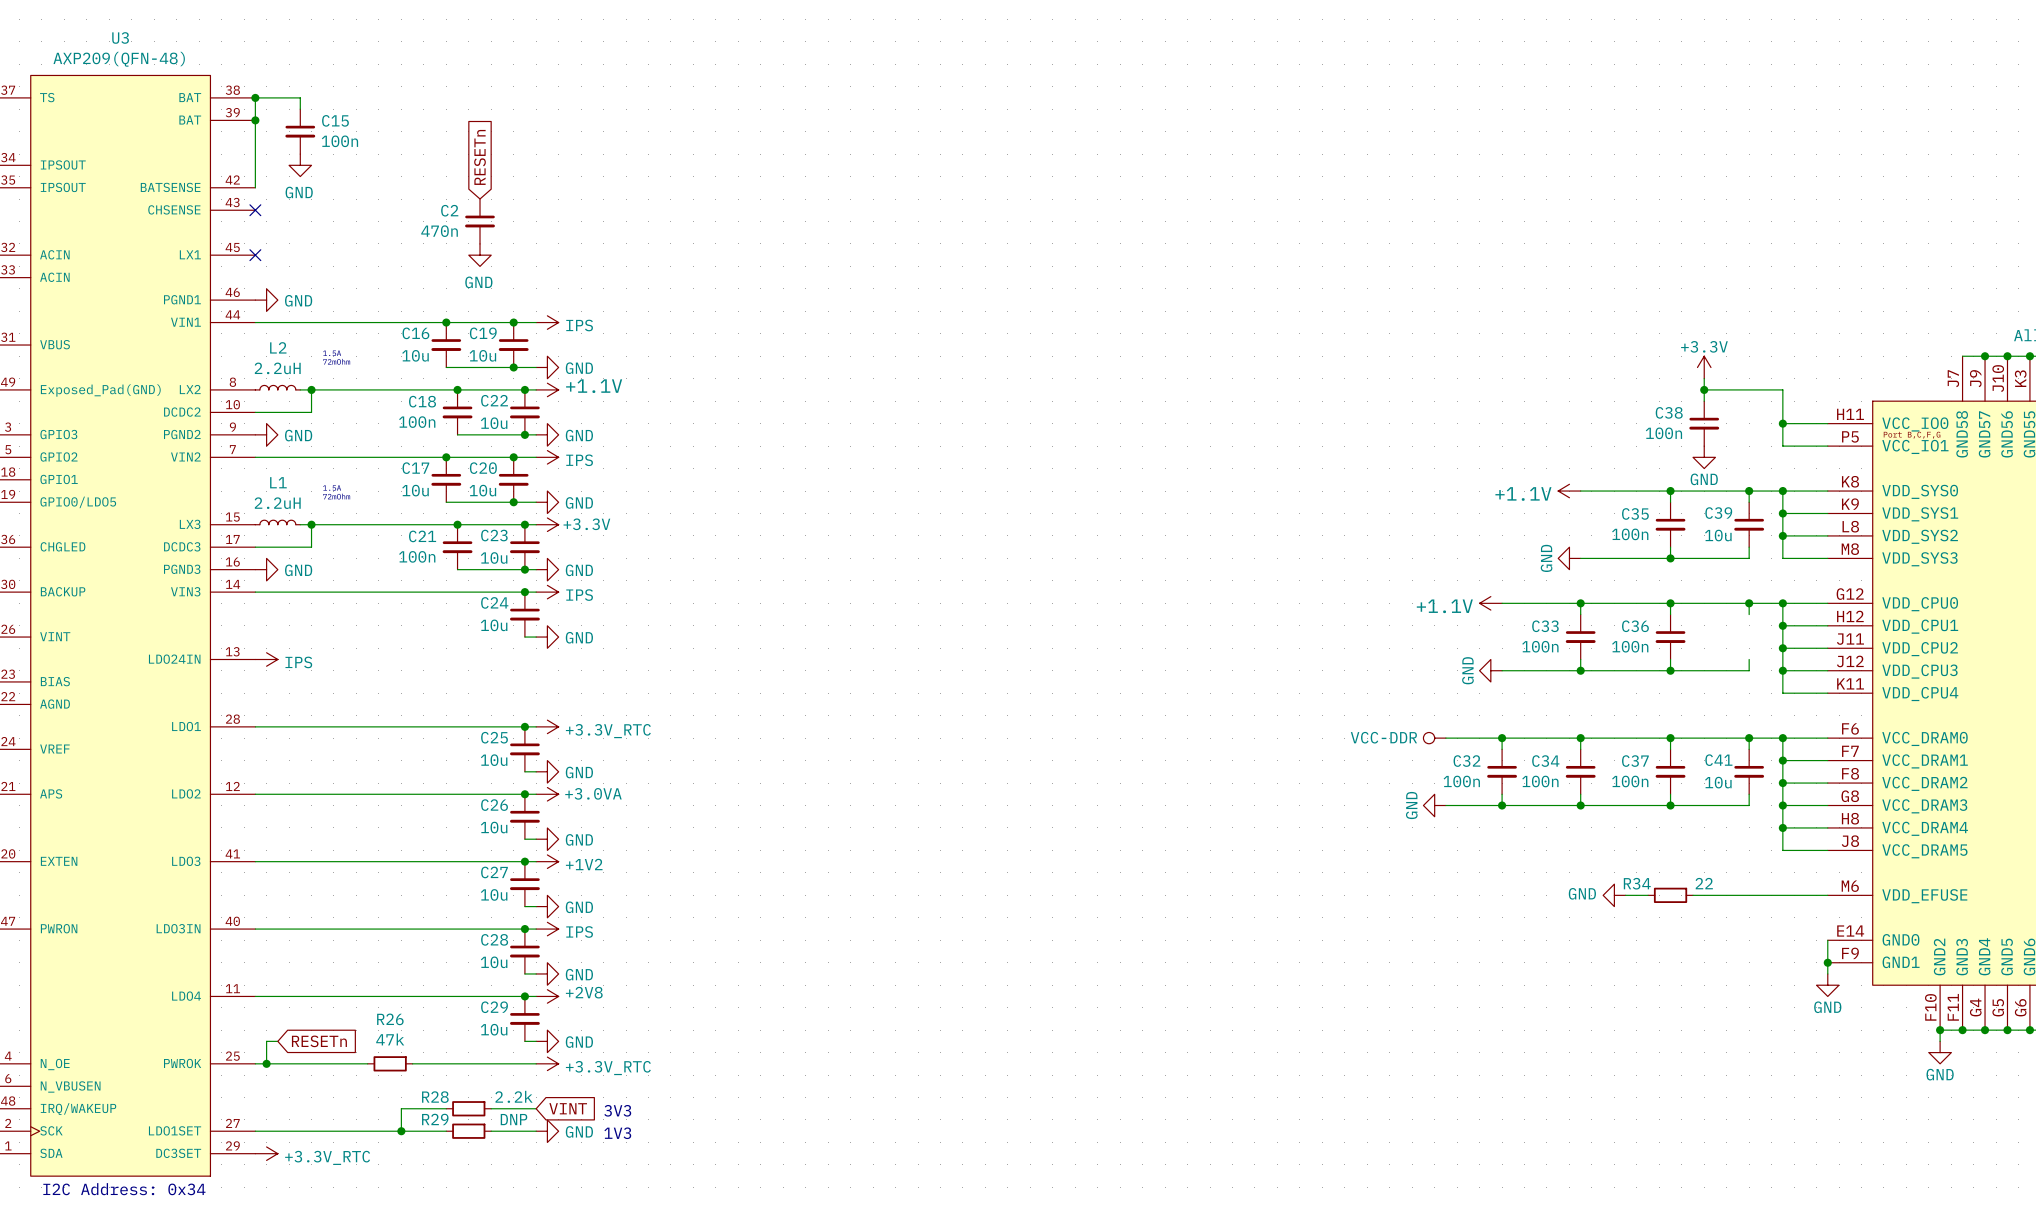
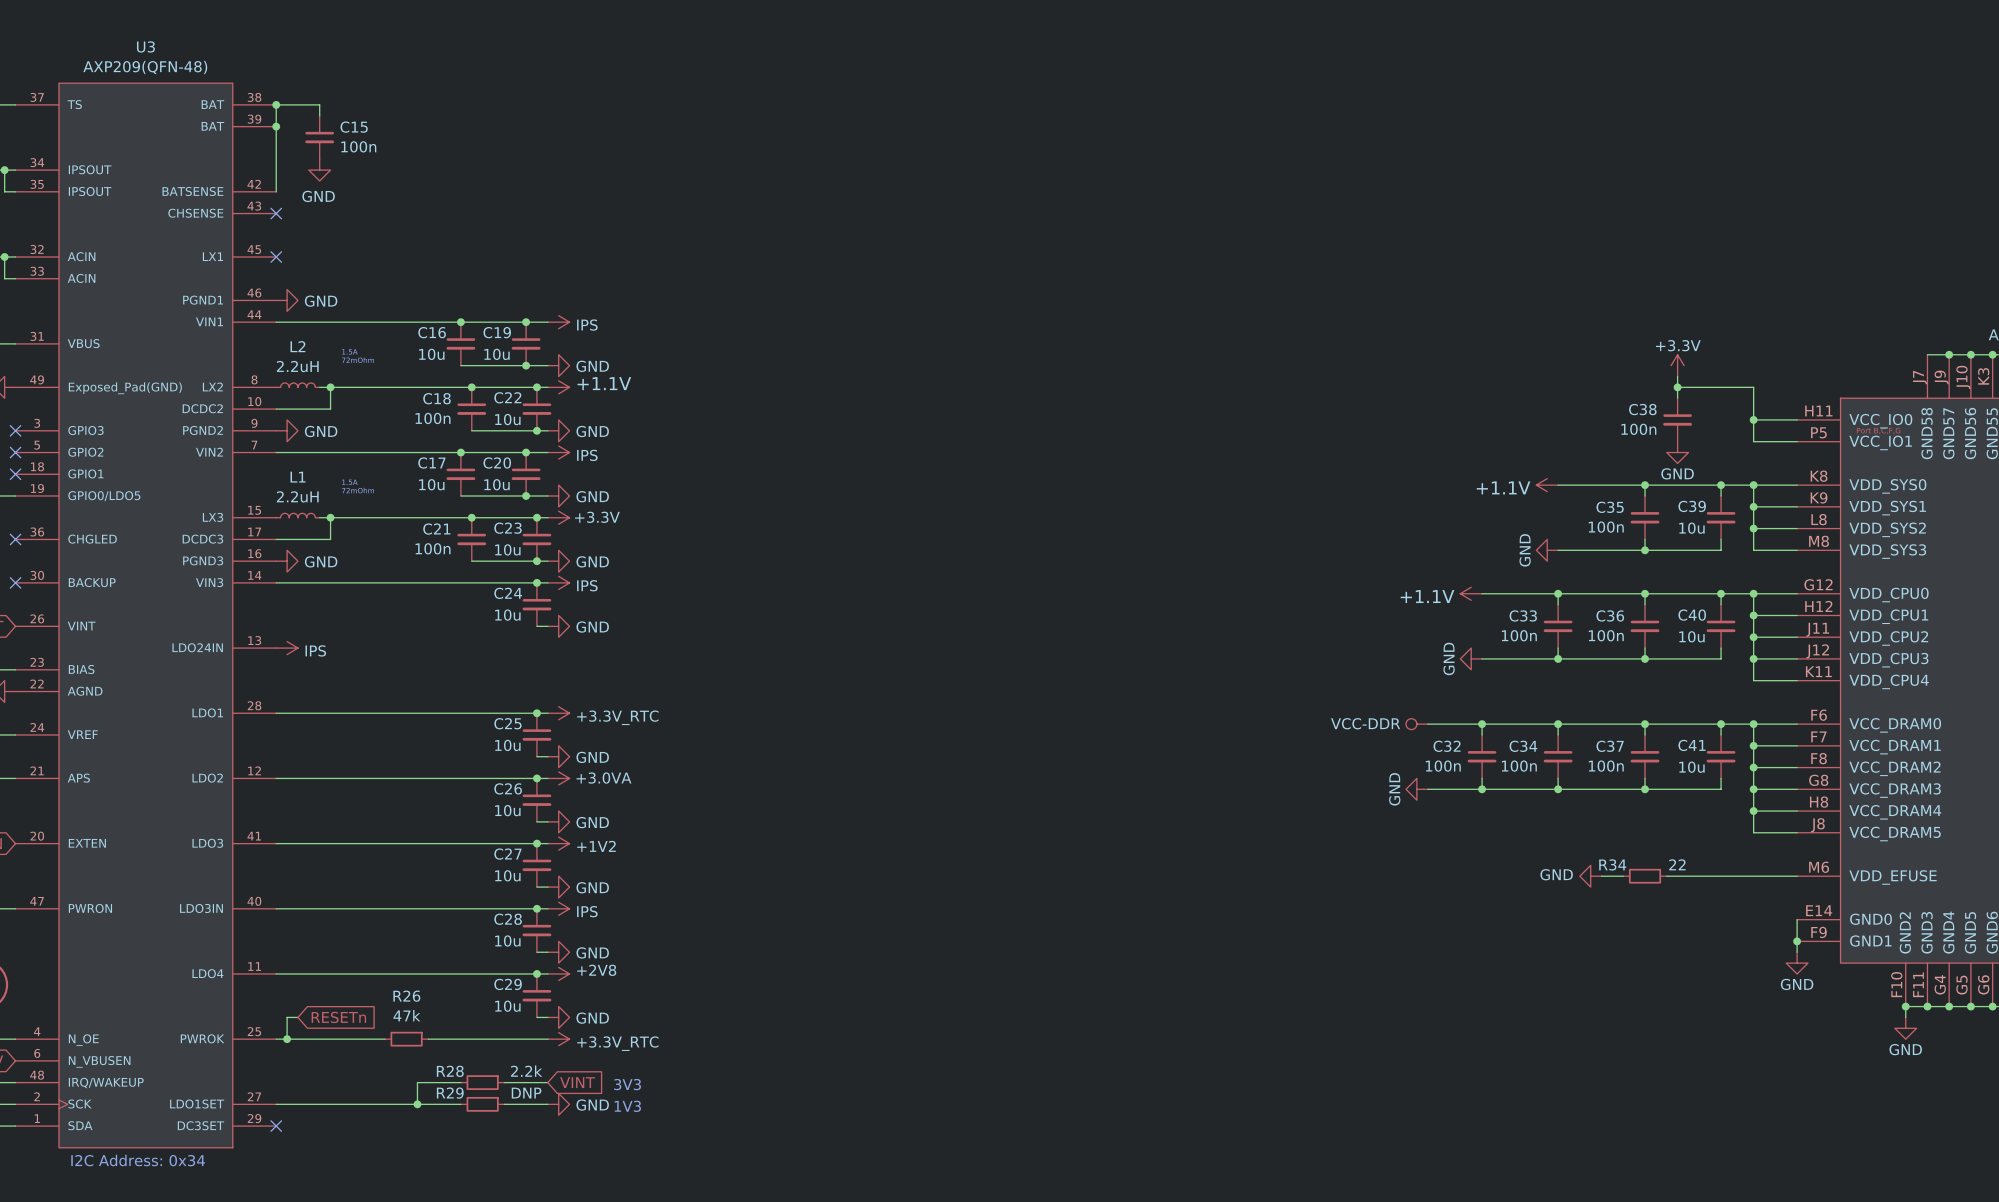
global label: RESETn (480, 157) -> none
C2: 470n (480, 221) -> none
power symbol: GND (480, 255) -> none
C40: none -> 10u (1721, 626)
no-connect mark: none -> (276, 1126)
power symbol: +3.3V_RTC (266, 1153) -> none

